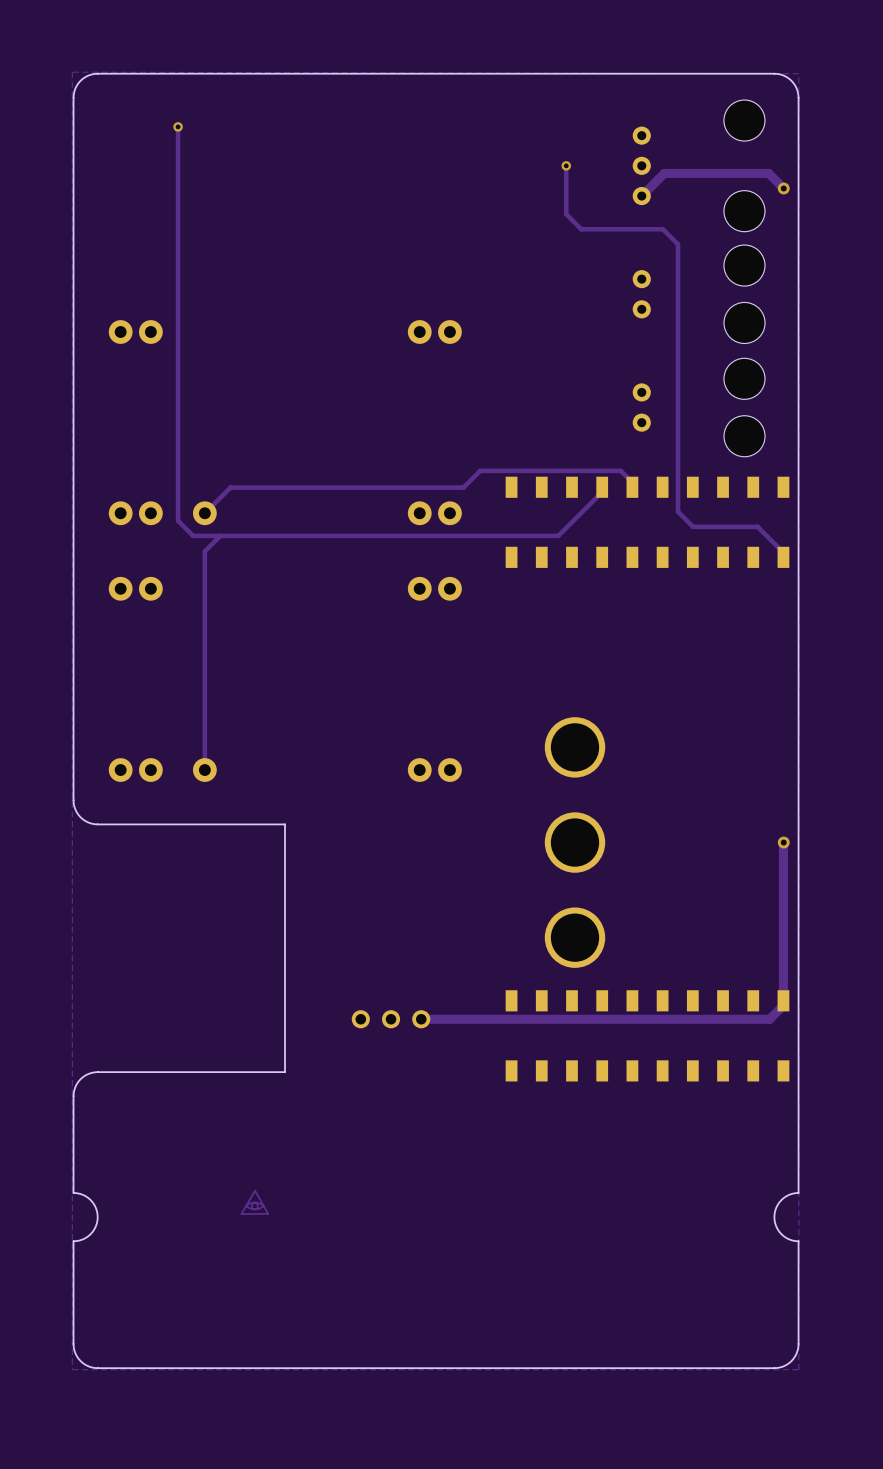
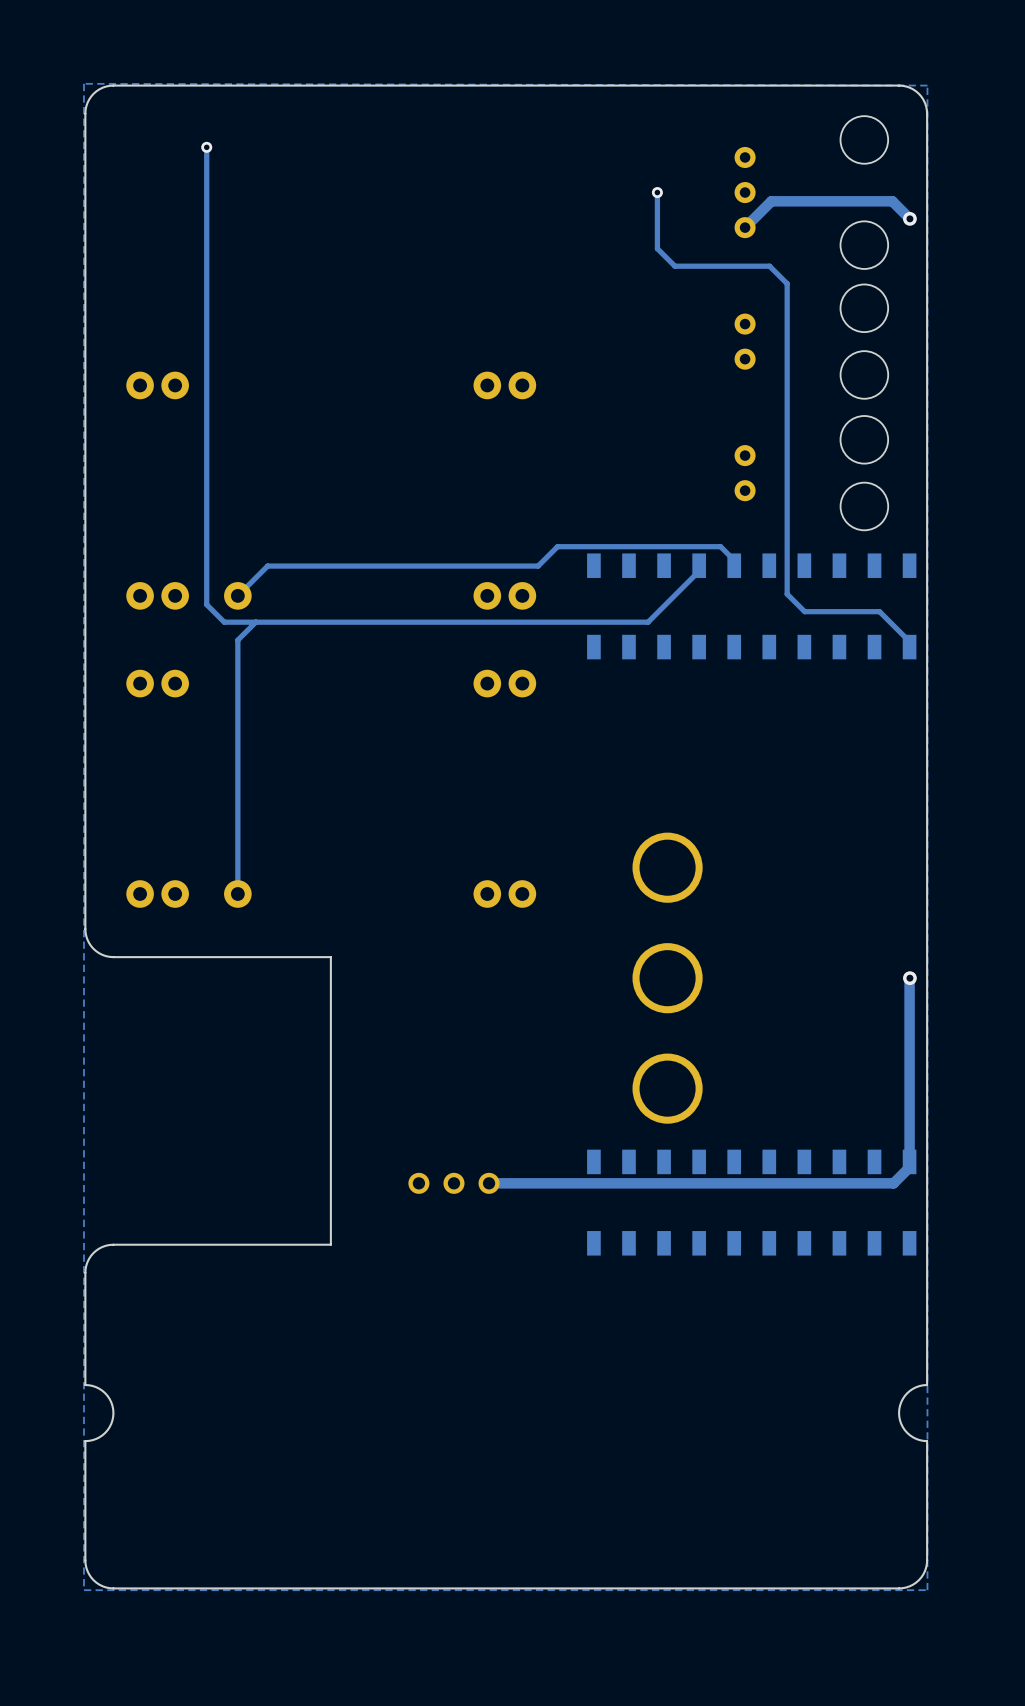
drawing: [240, 1189, 270, 1216] -> none

